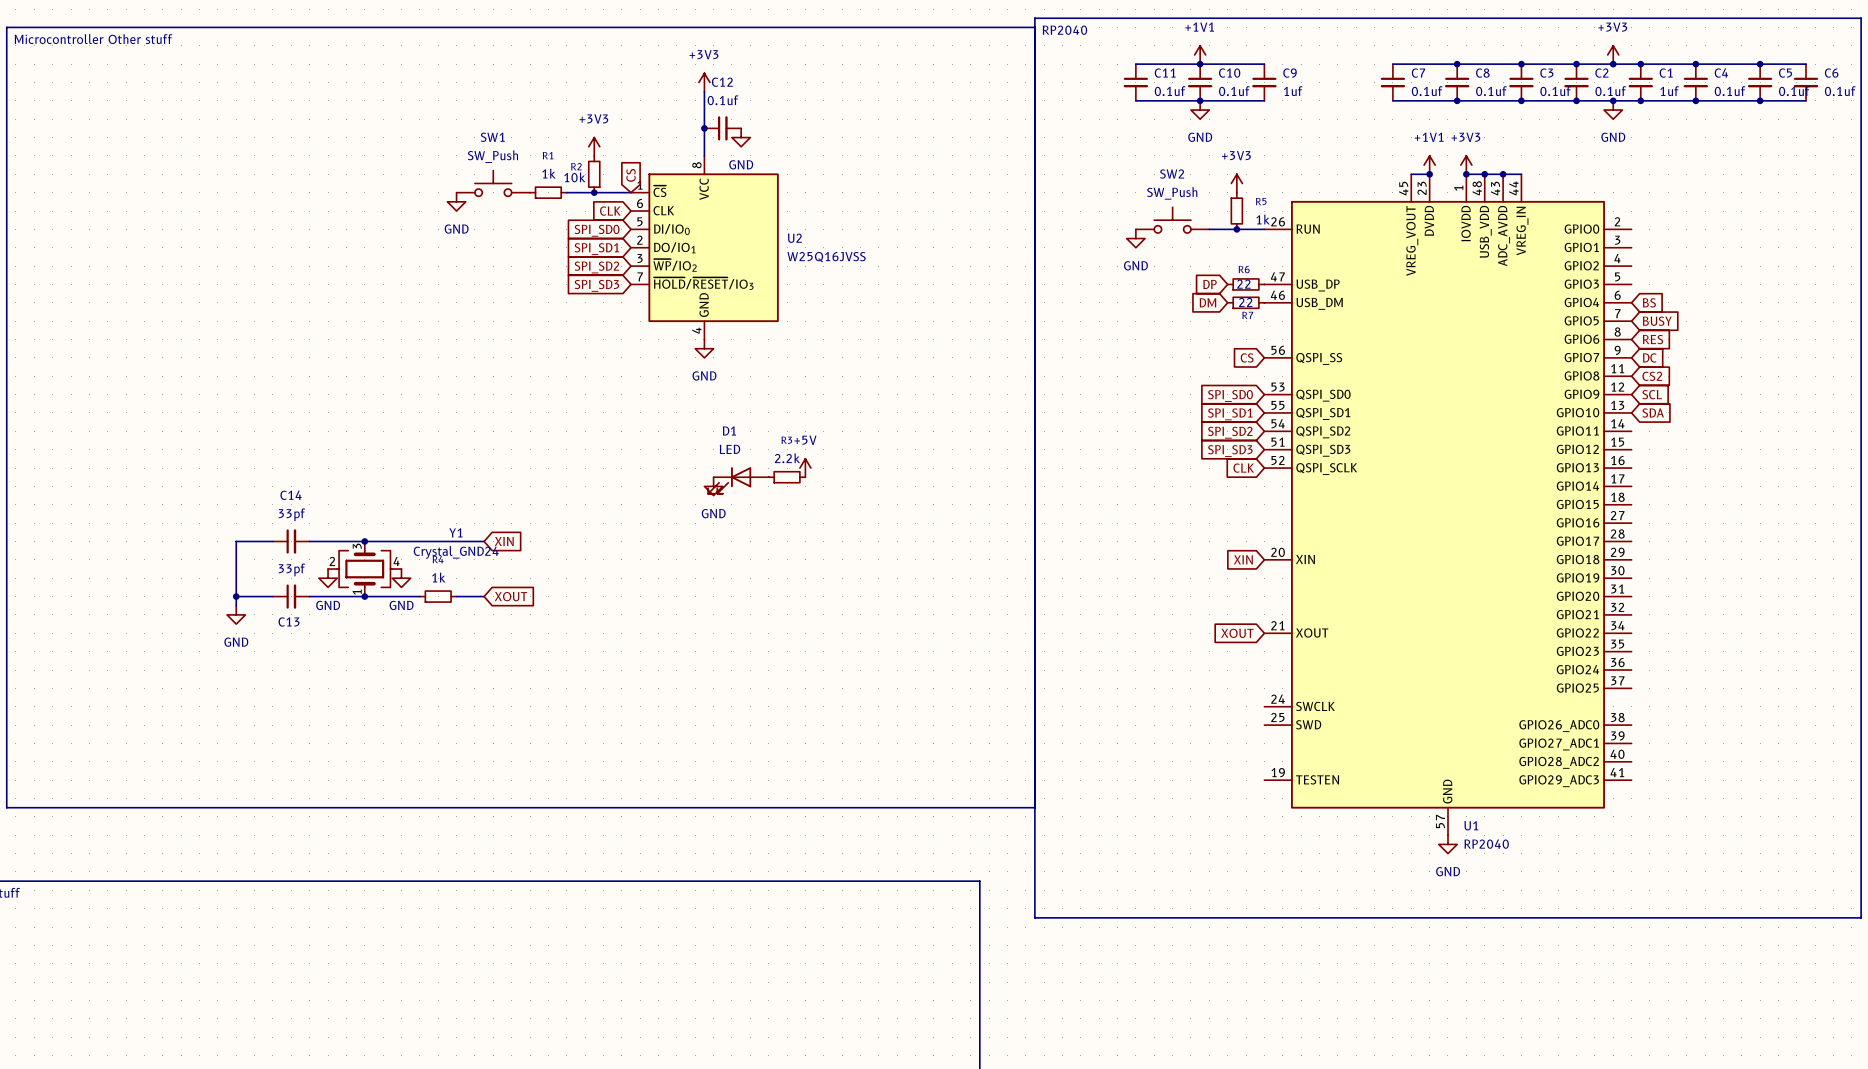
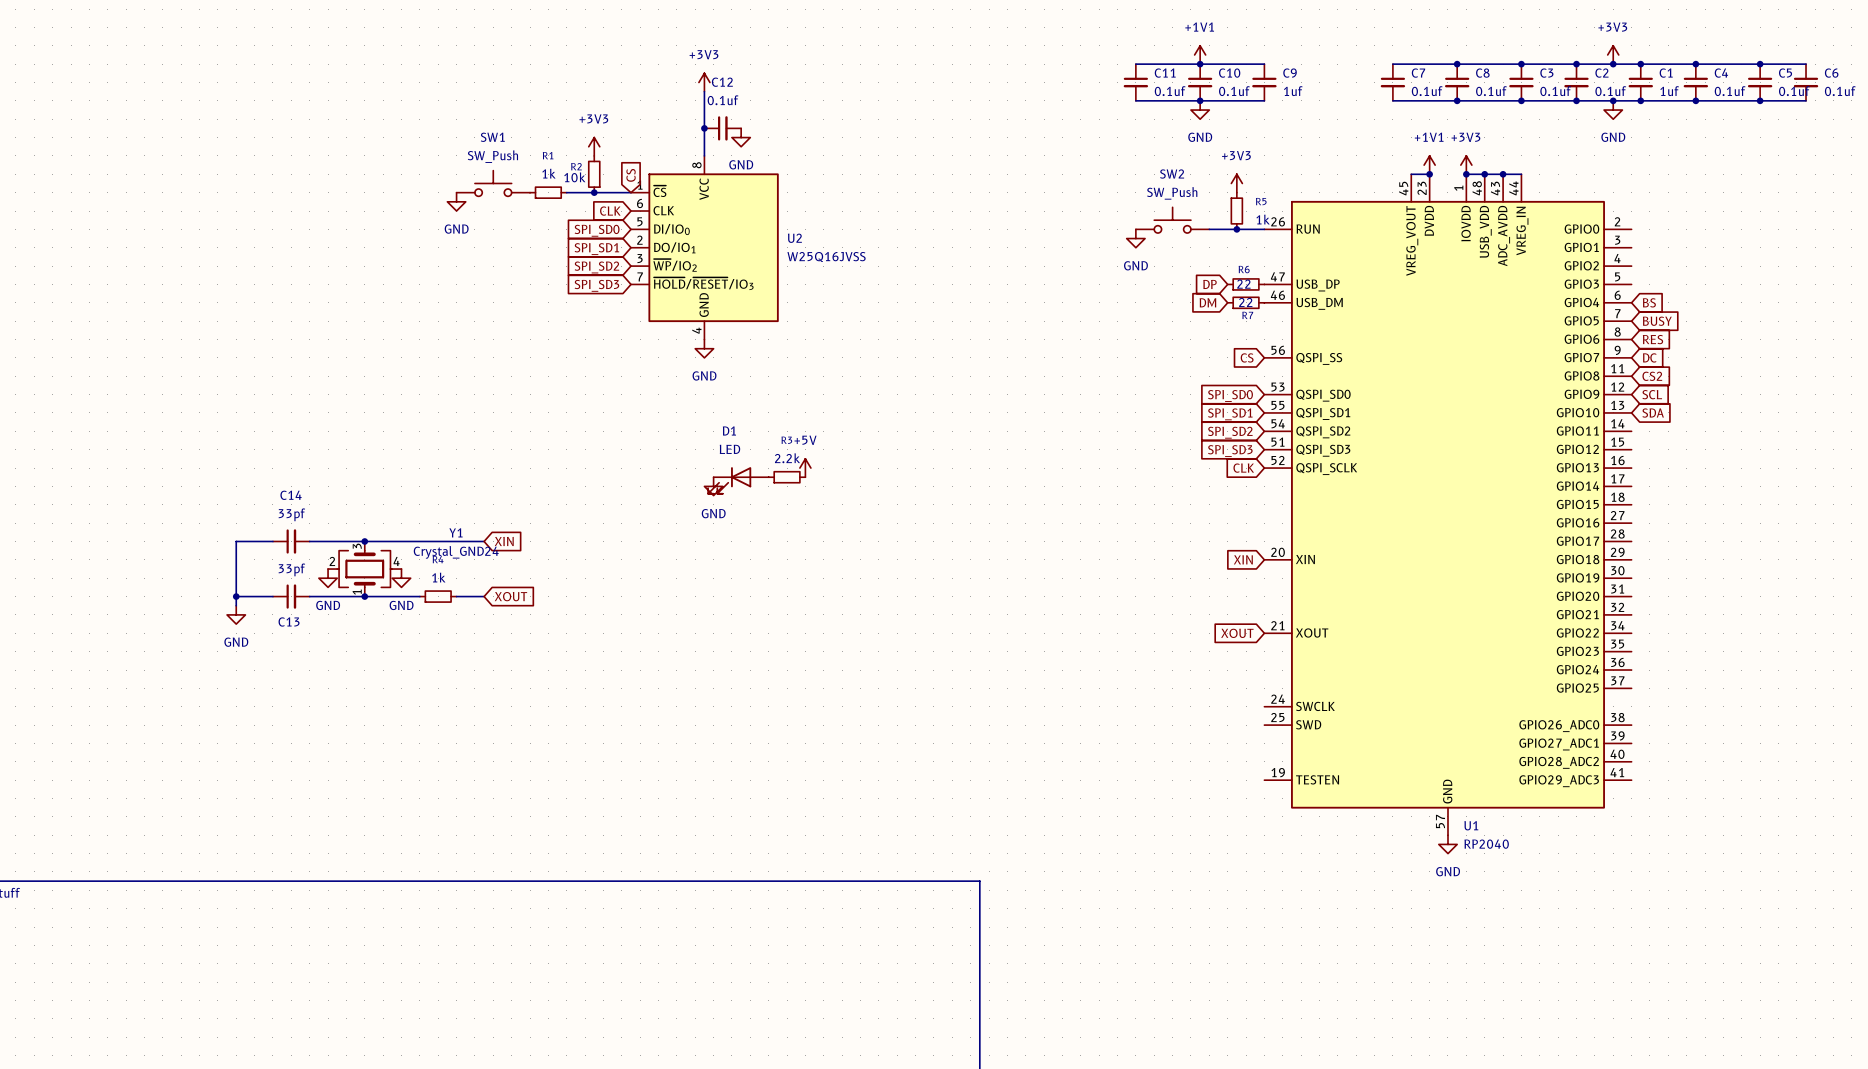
line: (1034, 18) (1034, 917) (1861, 917) (1861, 18) (1034, 18) -> none
line: (1034, 27) (6, 27) (6, 807) (1034, 807) -> none
text: RP2040 (1064, 30) -> none
text: Microcontroller Other stuff (93, 39) -> none

